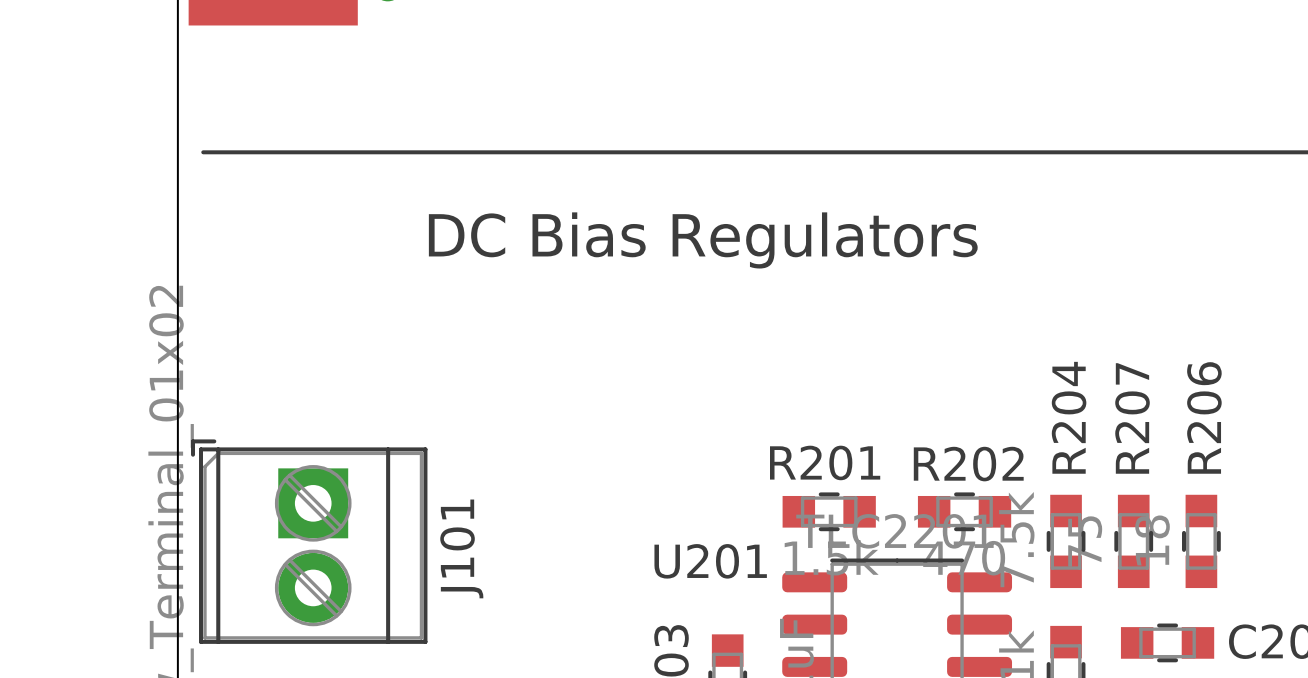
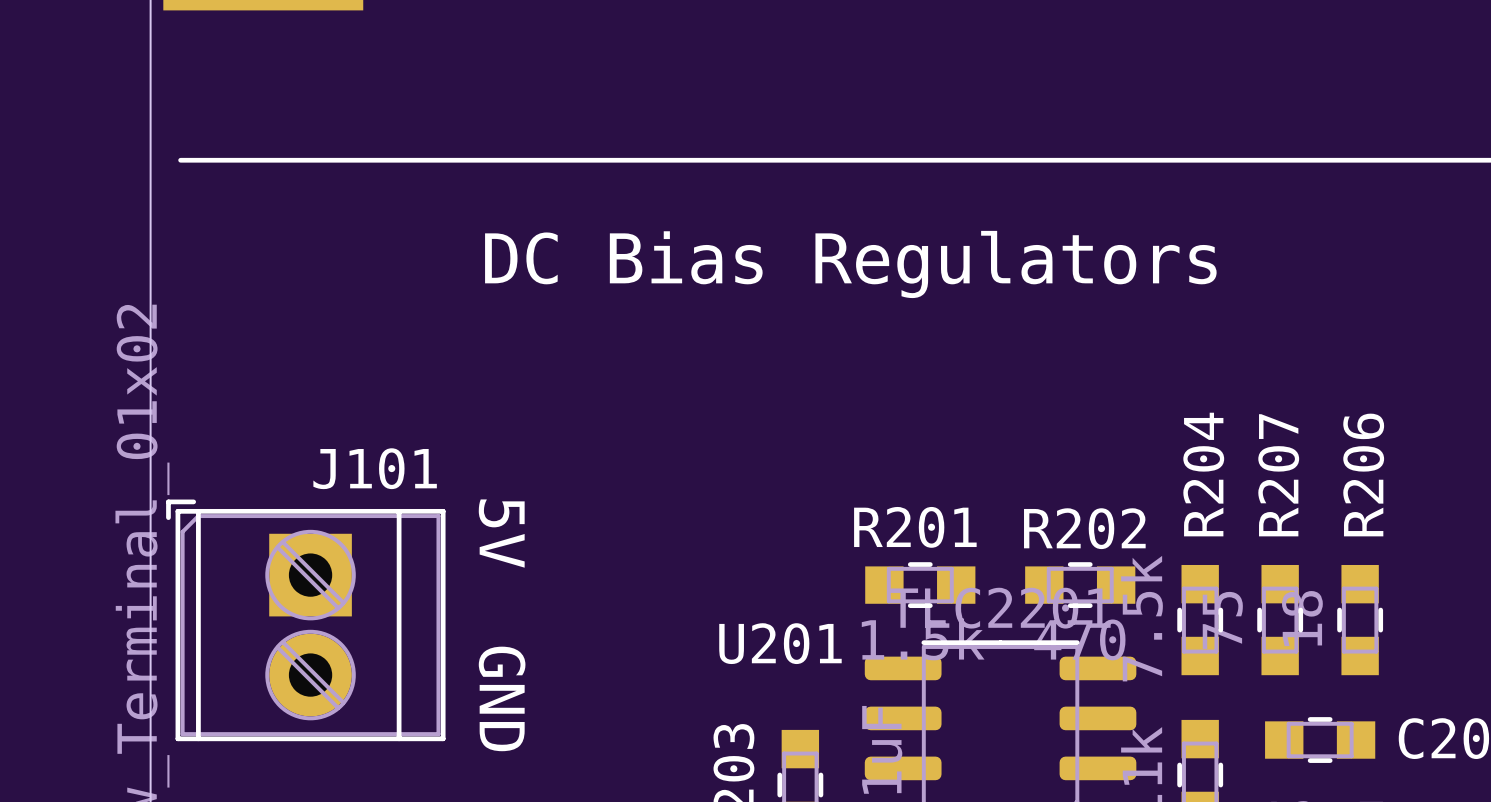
text position: DC Bias Regulators (703, 240) -> DC Bias Regulators (850, 264)
text: none -> 5V (501, 533)
J101 name rotation: 0° (461, 548) -> 90° clockwise (375, 468)
J101 name position: J101 (461, 548) -> J101 (375, 468)
text: none -> GND (502, 698)

